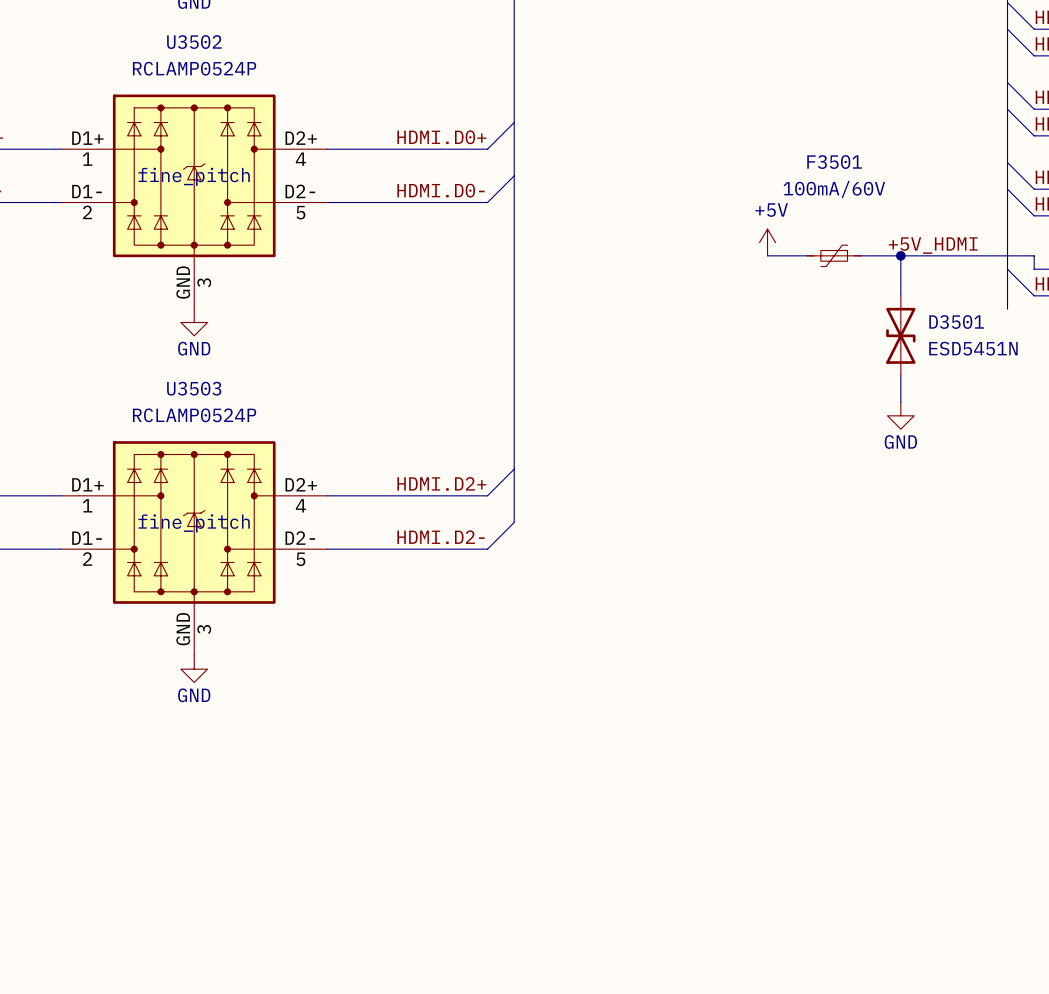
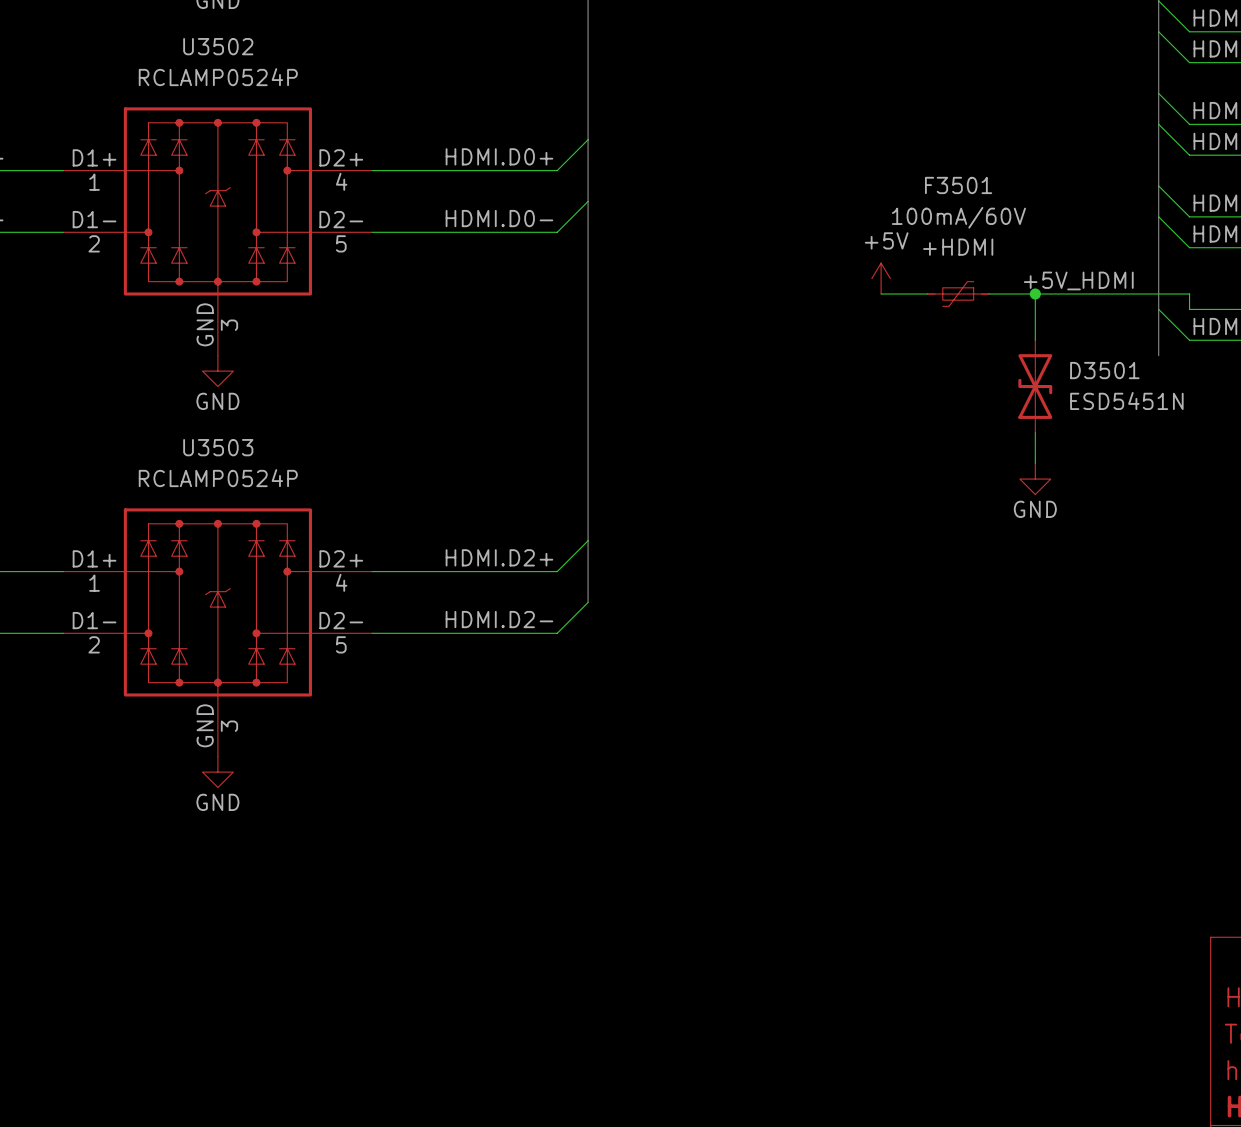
U3502 text: fine_pitch (194, 176) -> none
F3501 text: none -> +HDMI (958, 247)
U3503 text: fine_pitch (194, 523) -> none

